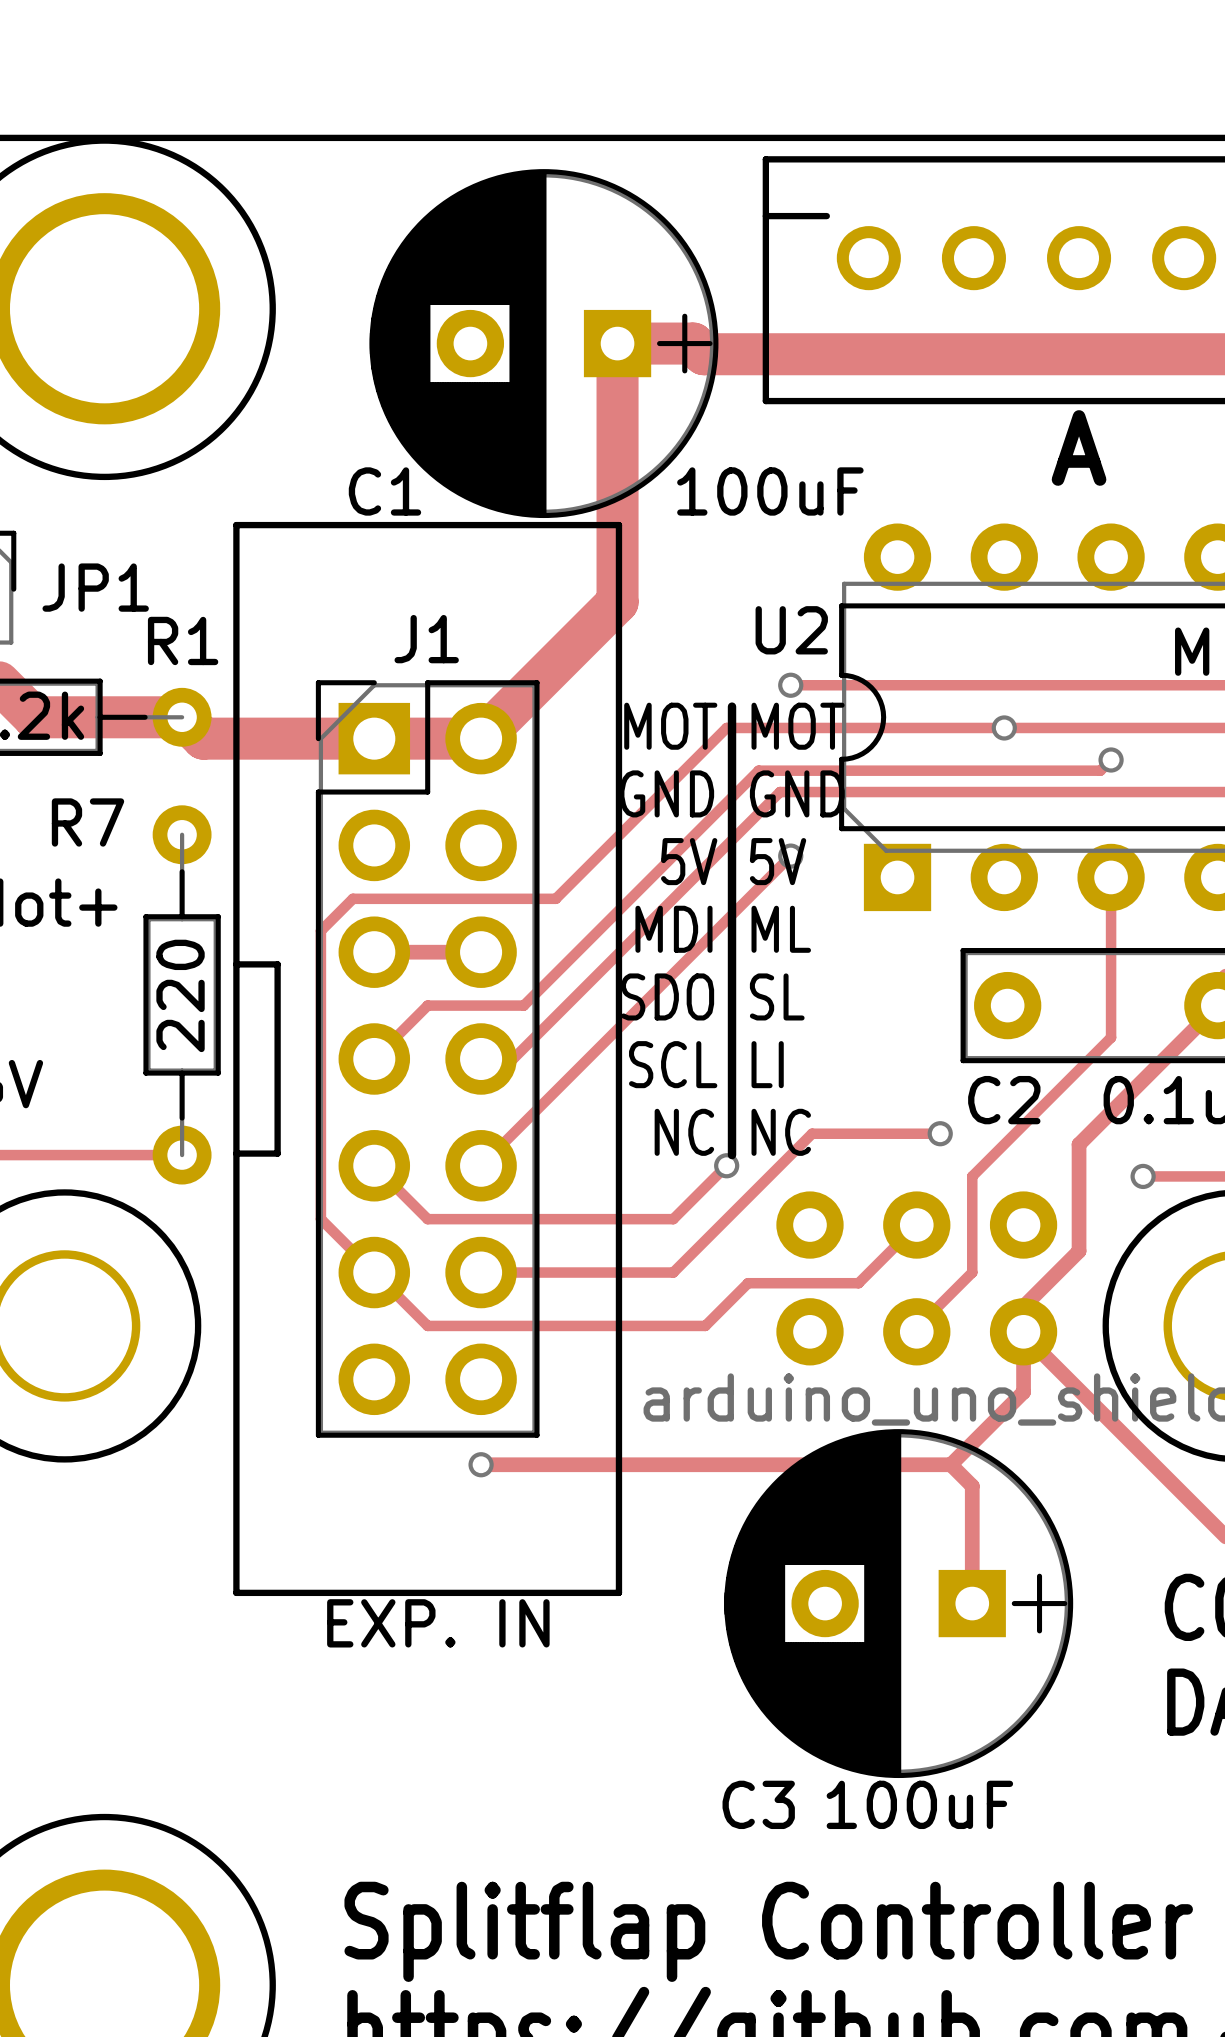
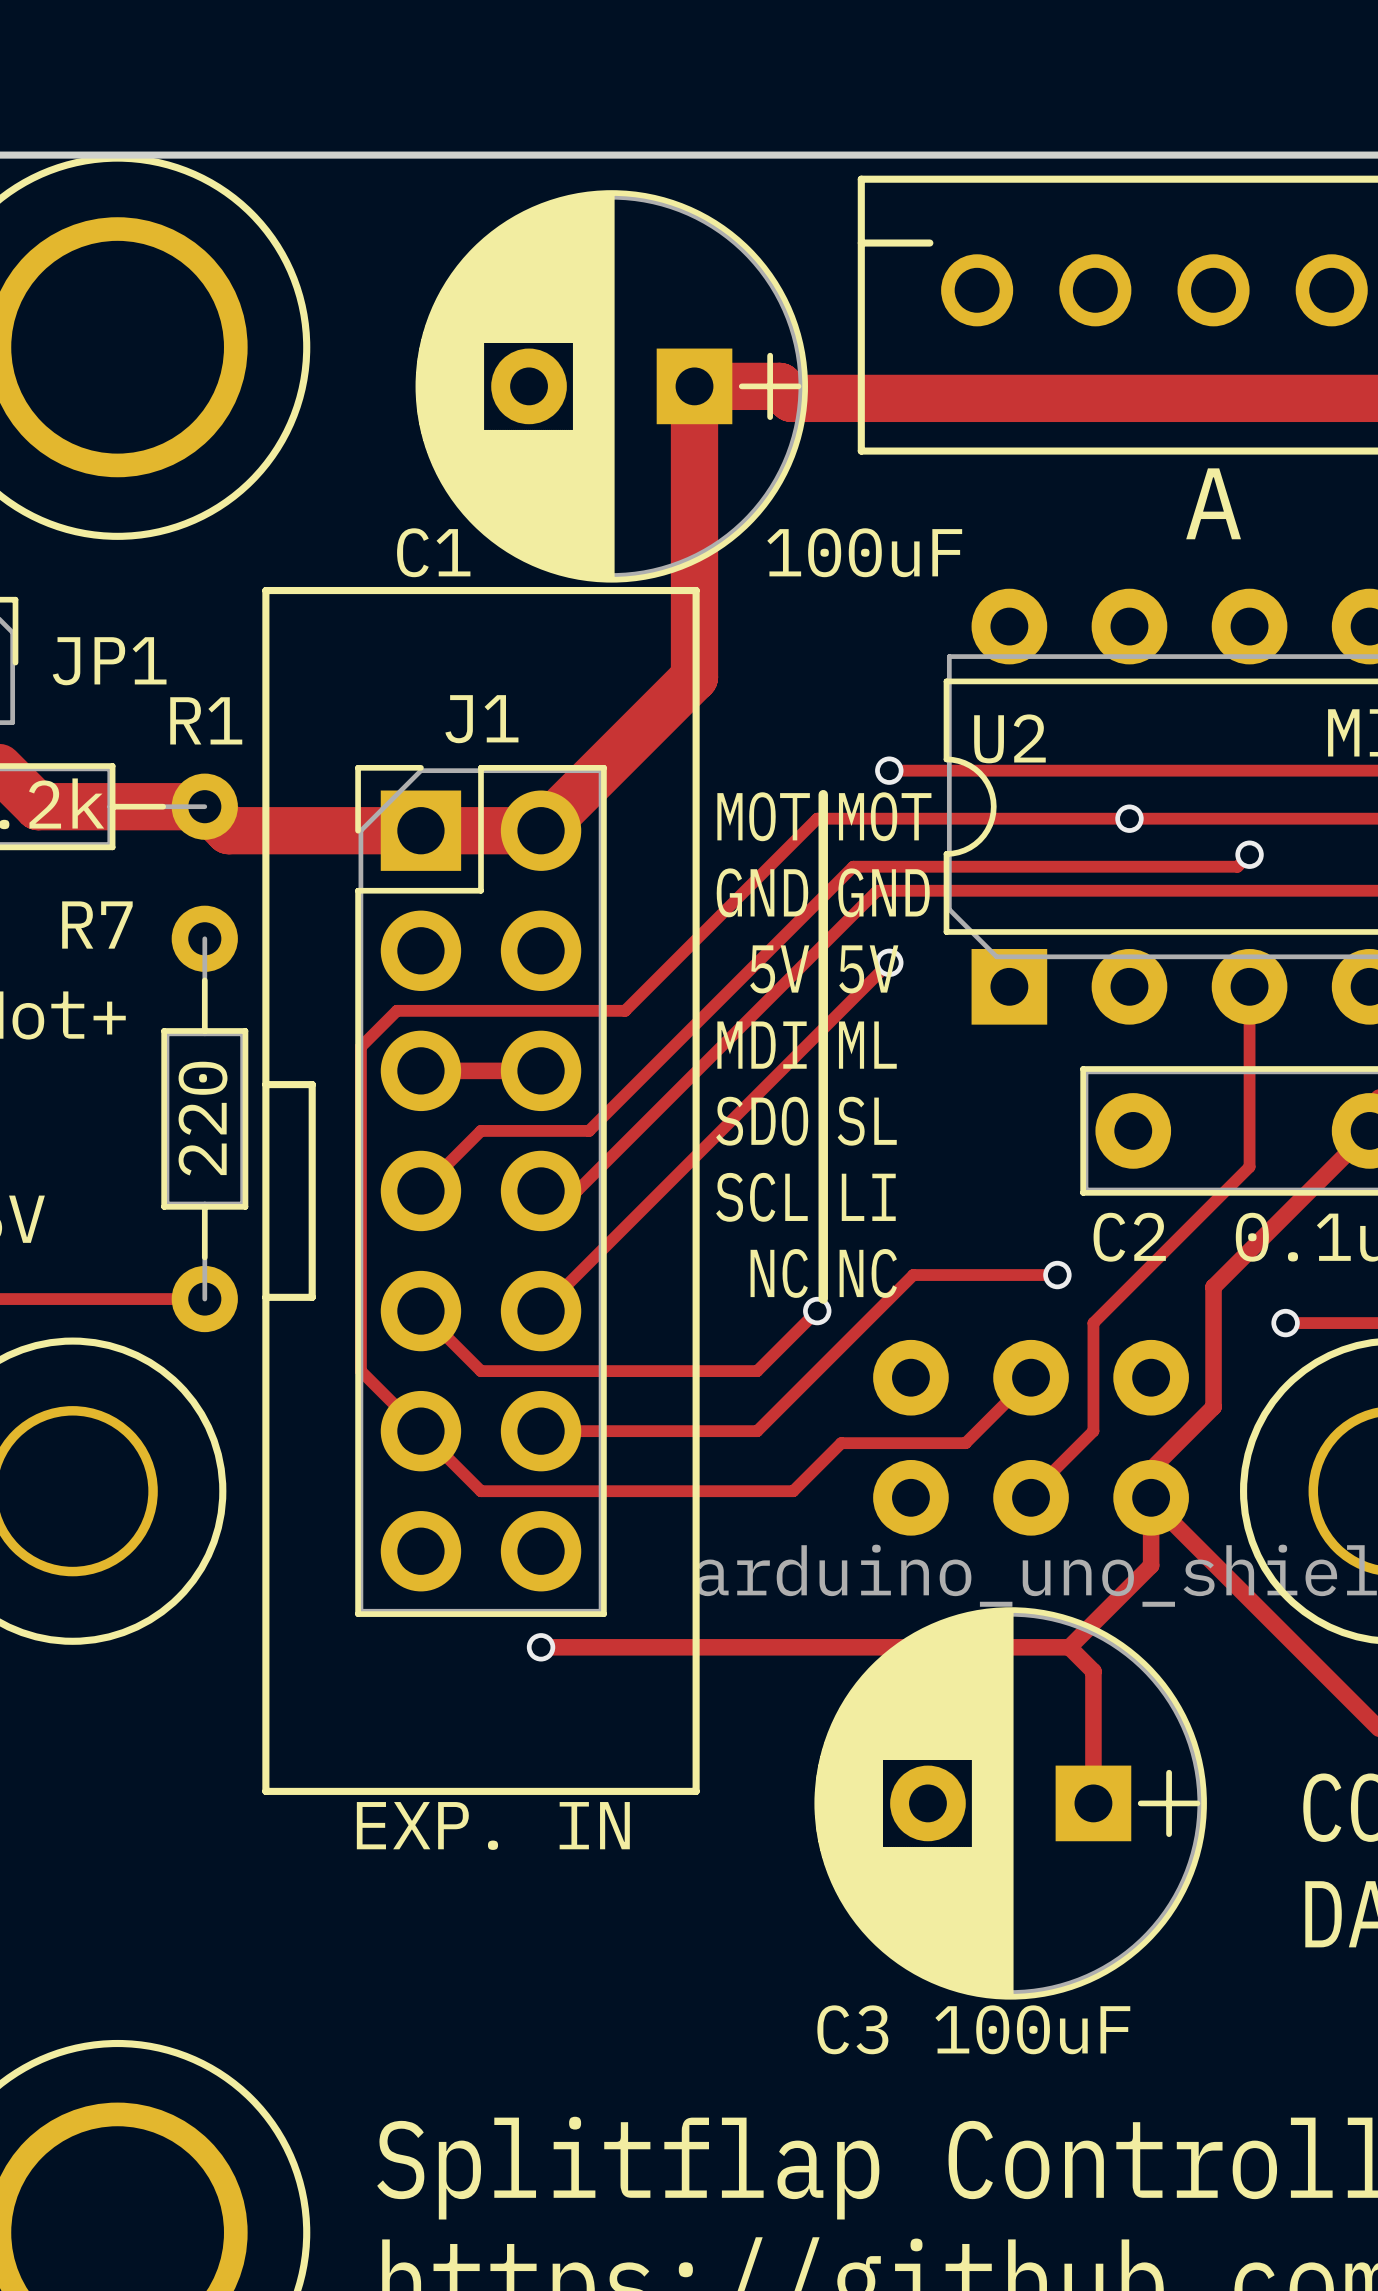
U2 name position: U2 (791, 630) -> U2 (1009, 738)

